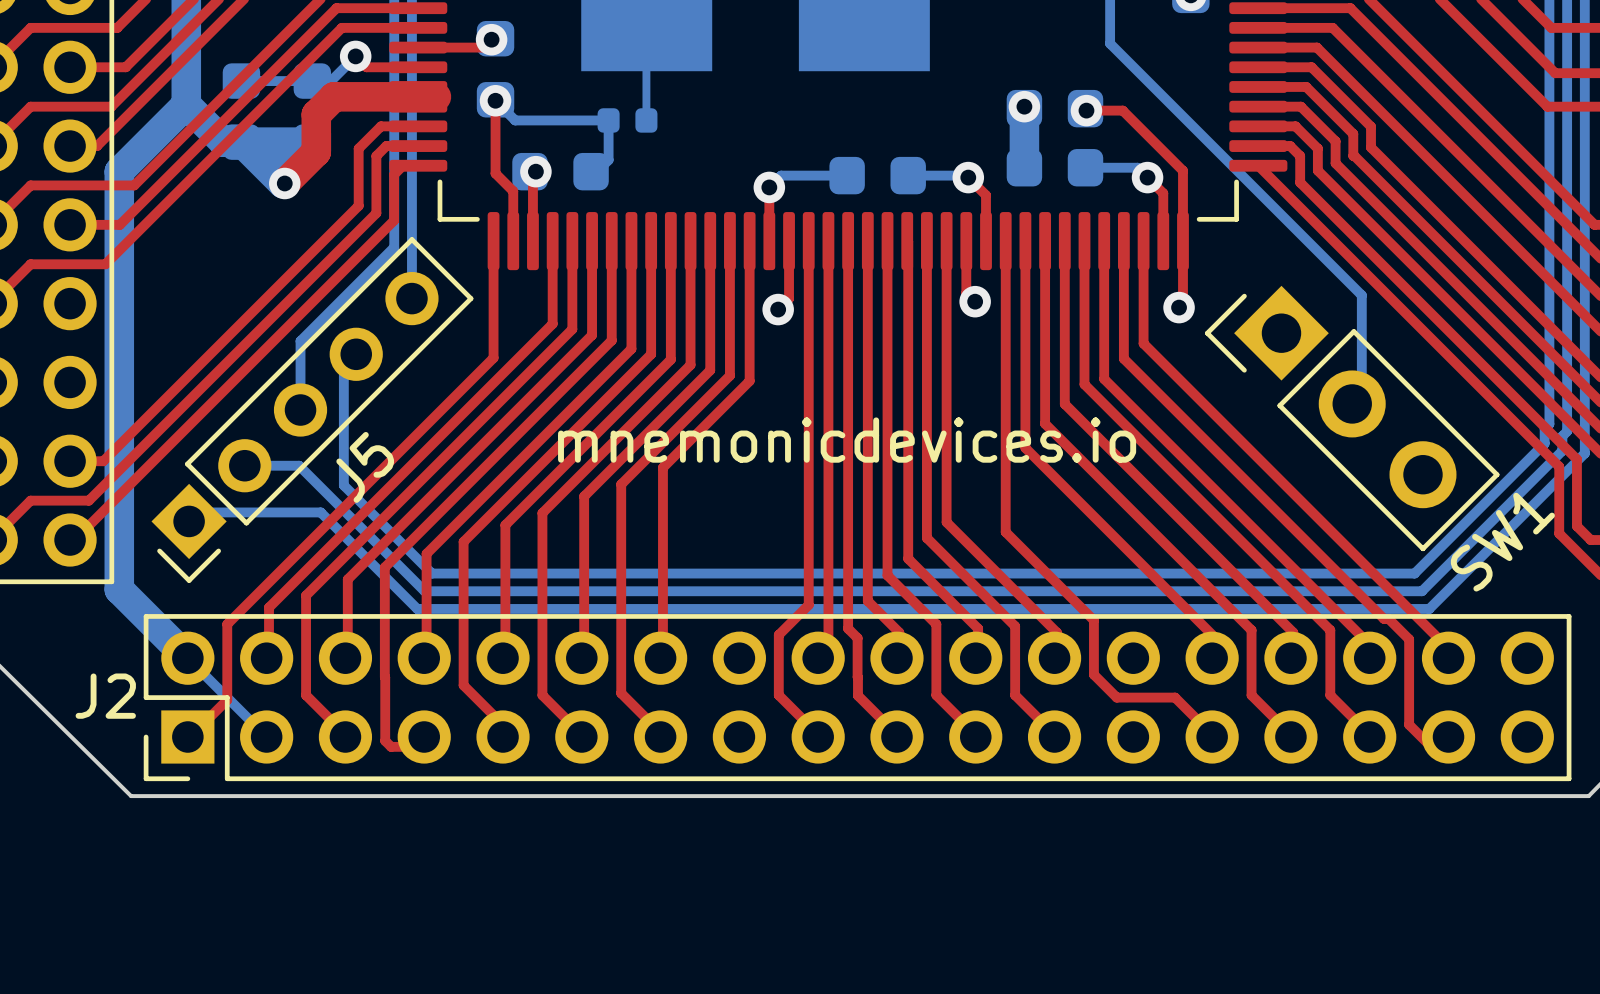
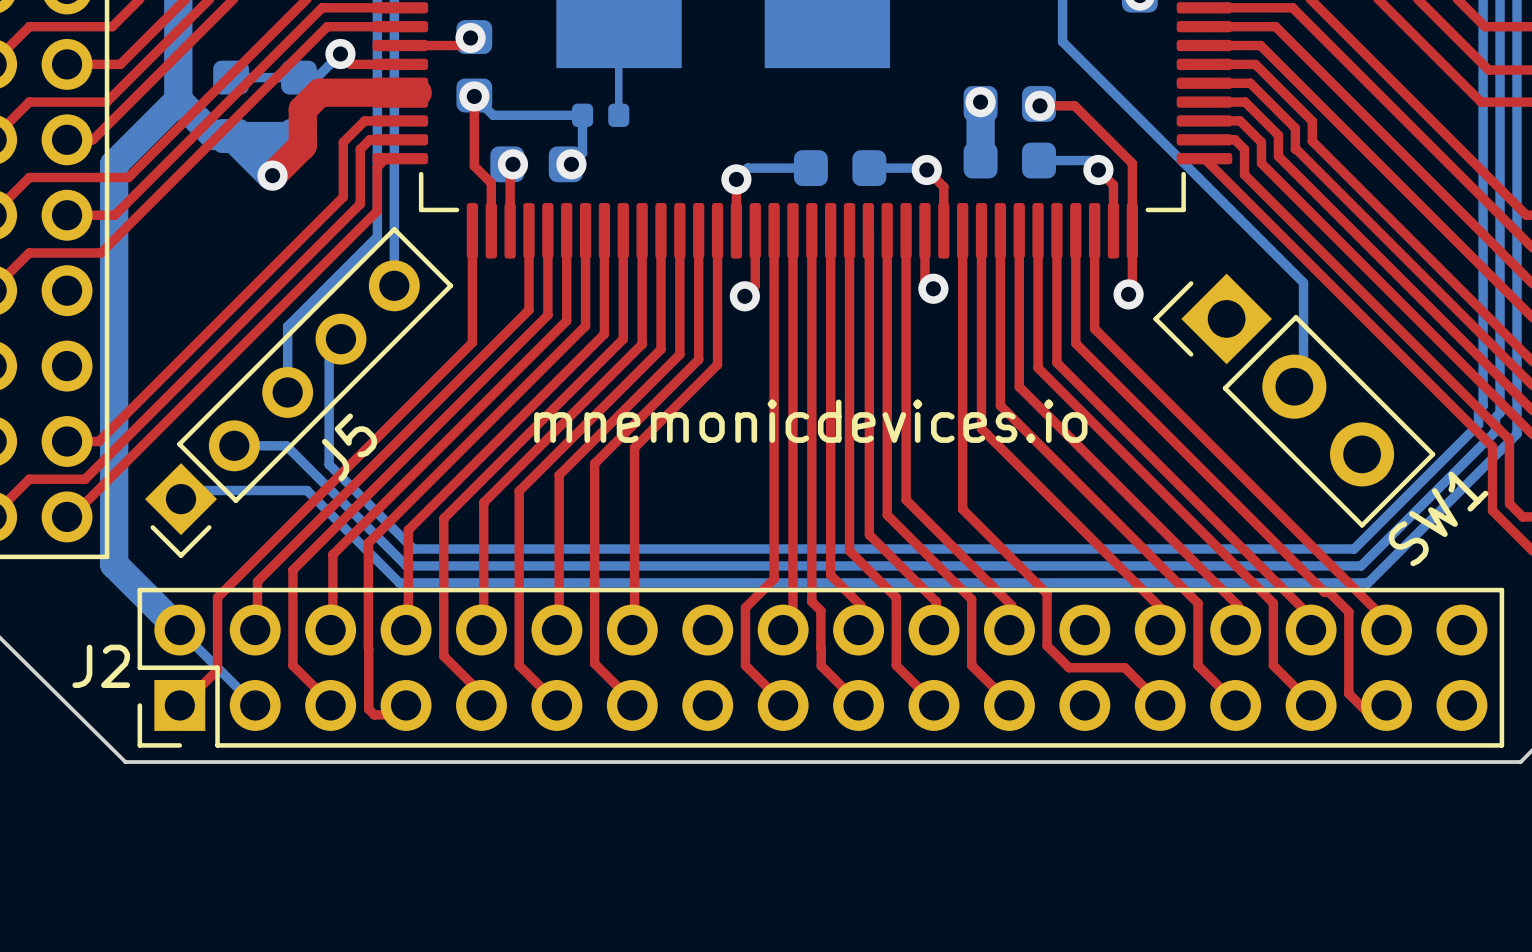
via: none -> (571, 164)

